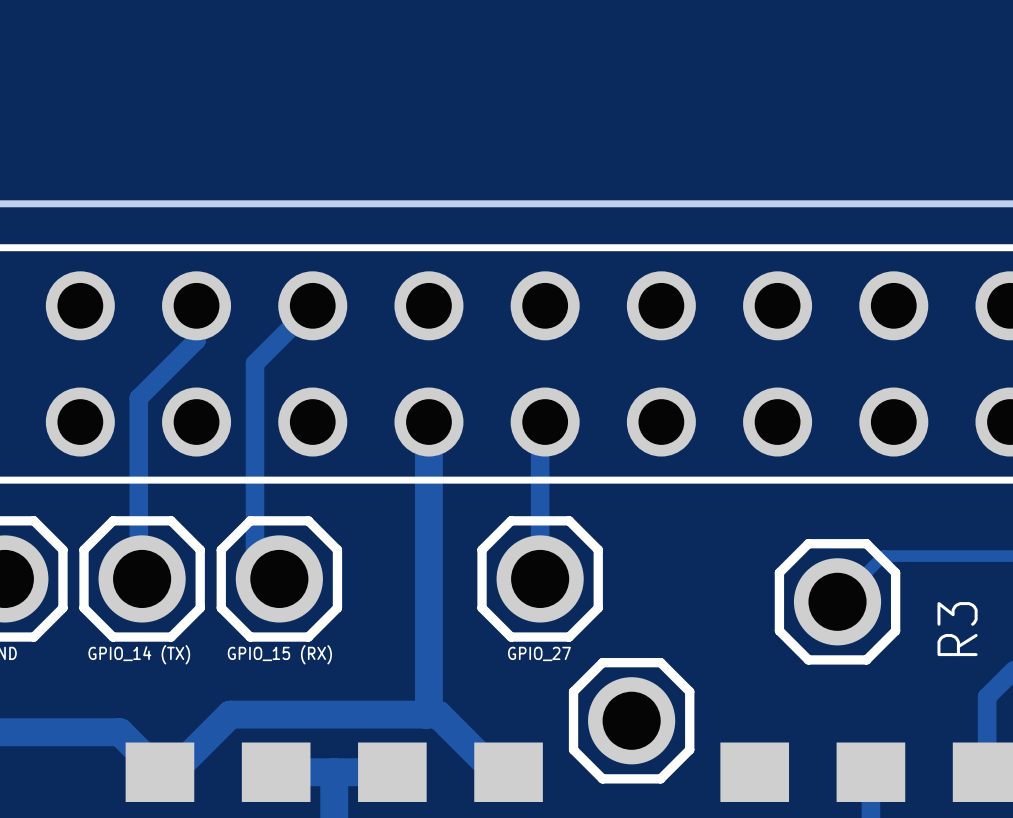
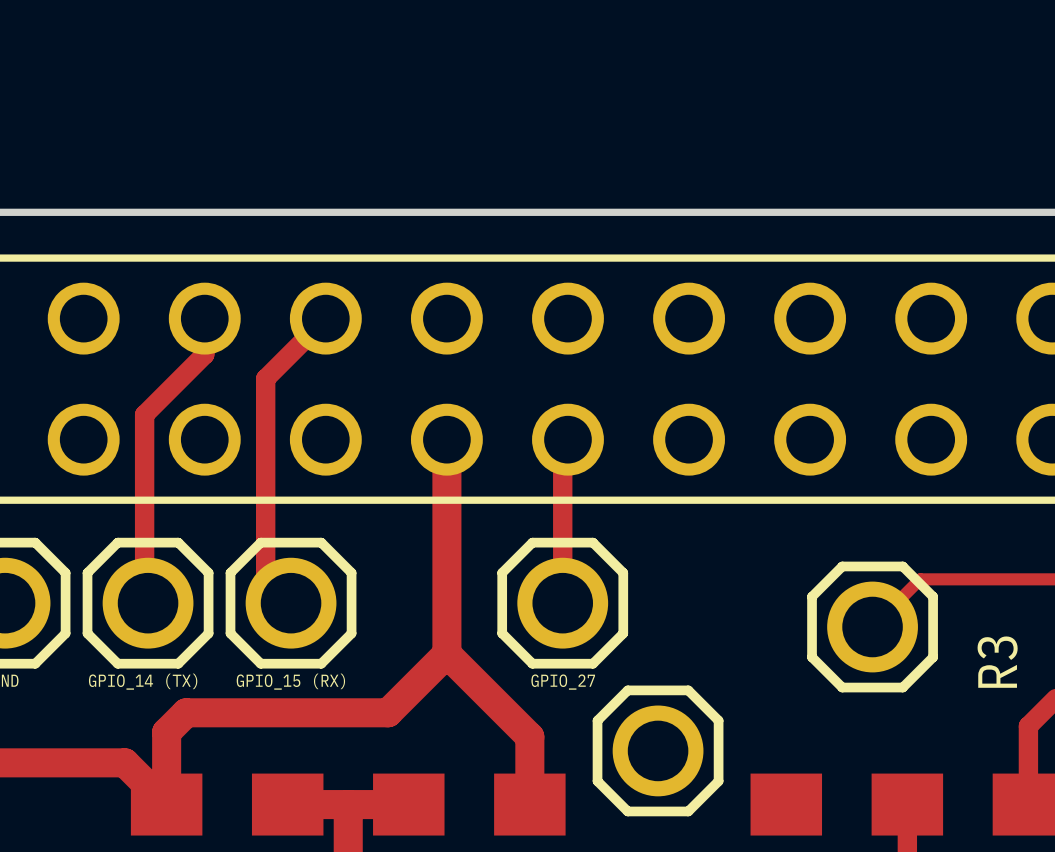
track: (428, 627) (428, 711) (425, 714) -> none
track: (159, 772) (172, 772) (230, 714) (438, 714) (495, 772) (508, 772) -> (166, 804) (166, 732) (186, 712) (388, 712) (446, 653) (529, 736) (529, 804)

